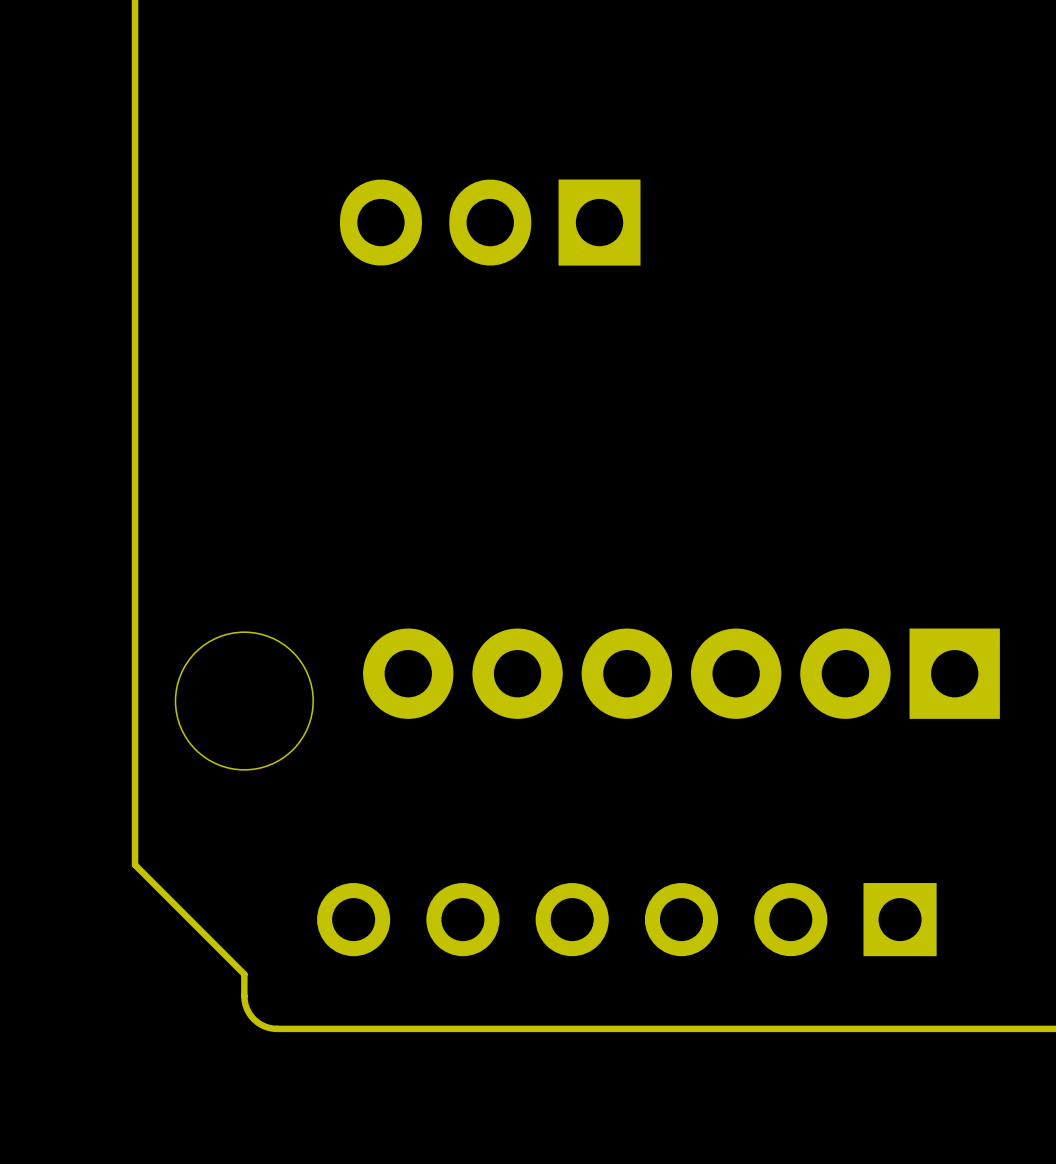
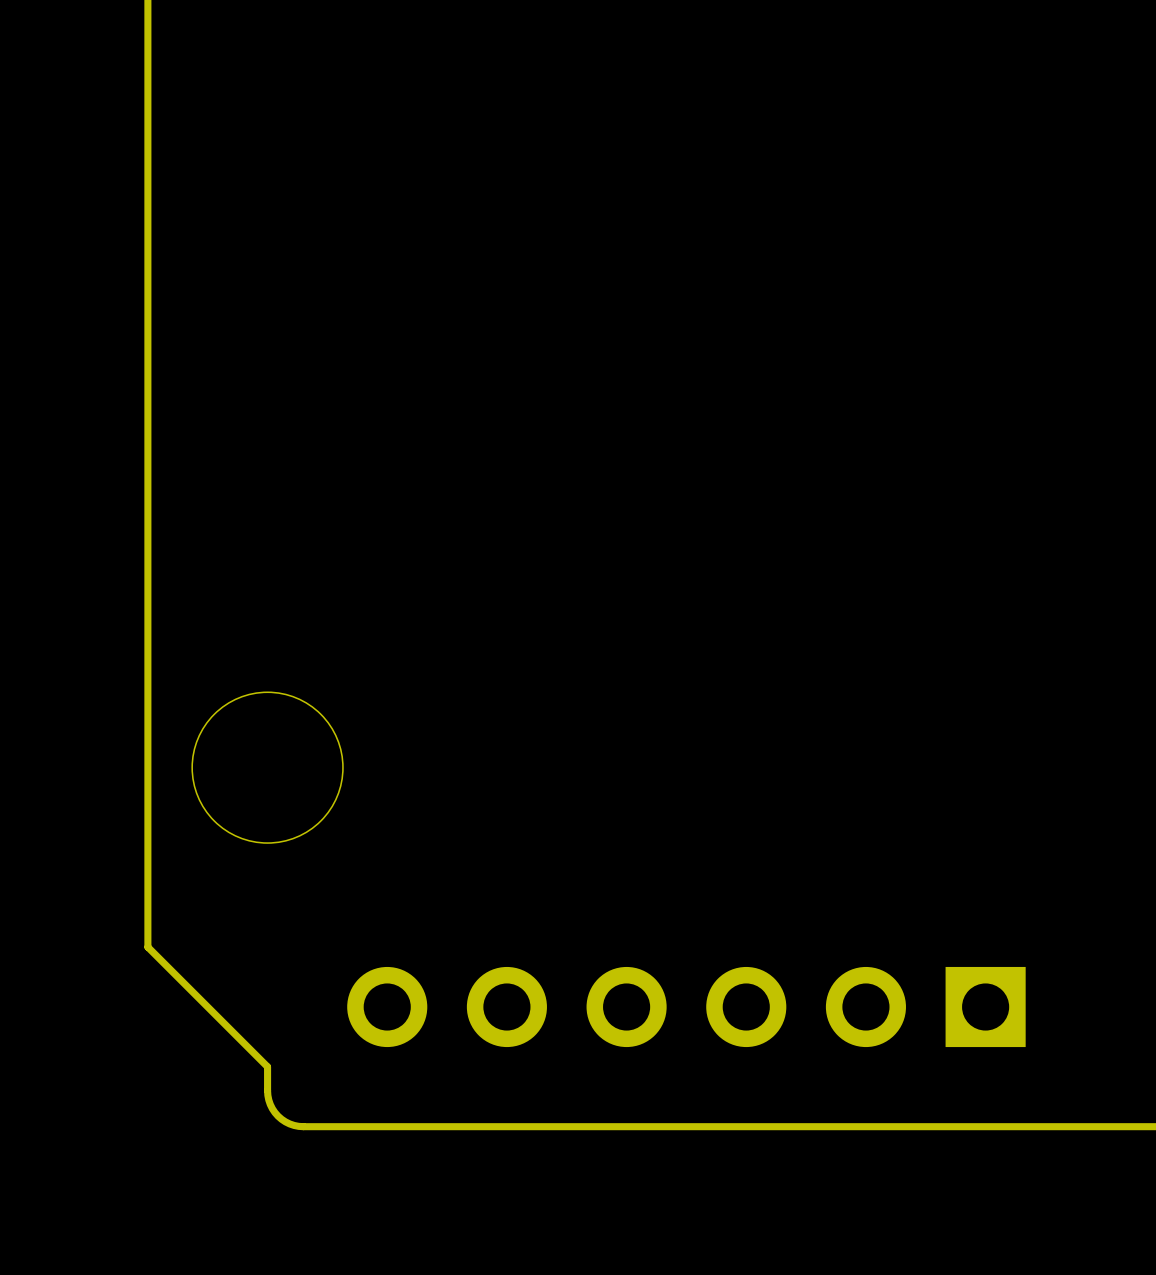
part: (490, 222) -> none
part: (681, 673) -> none

